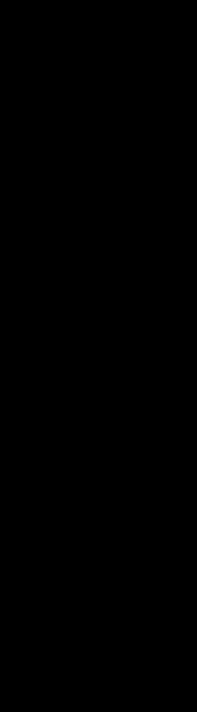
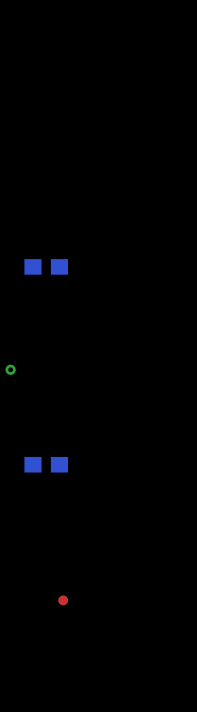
part: none -> (46, 266)
via: none -> (10, 369)
part: none -> (46, 464)
part: none -> (63, 600)

